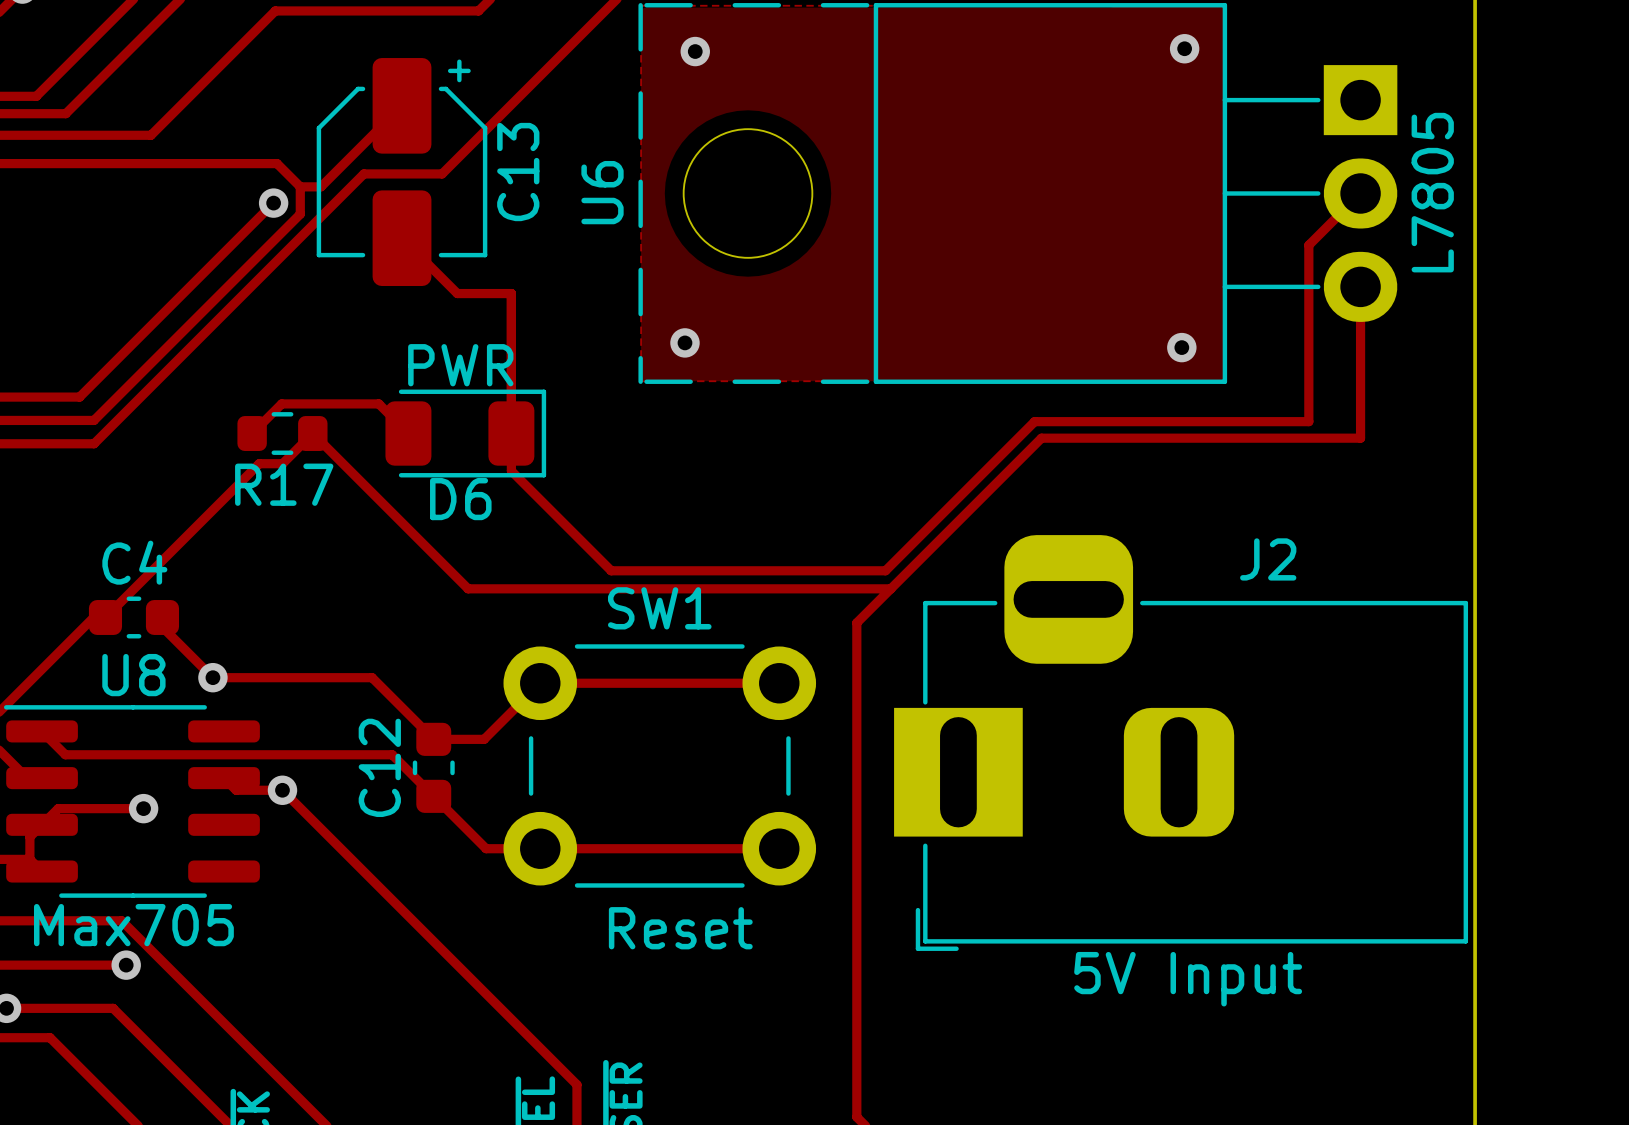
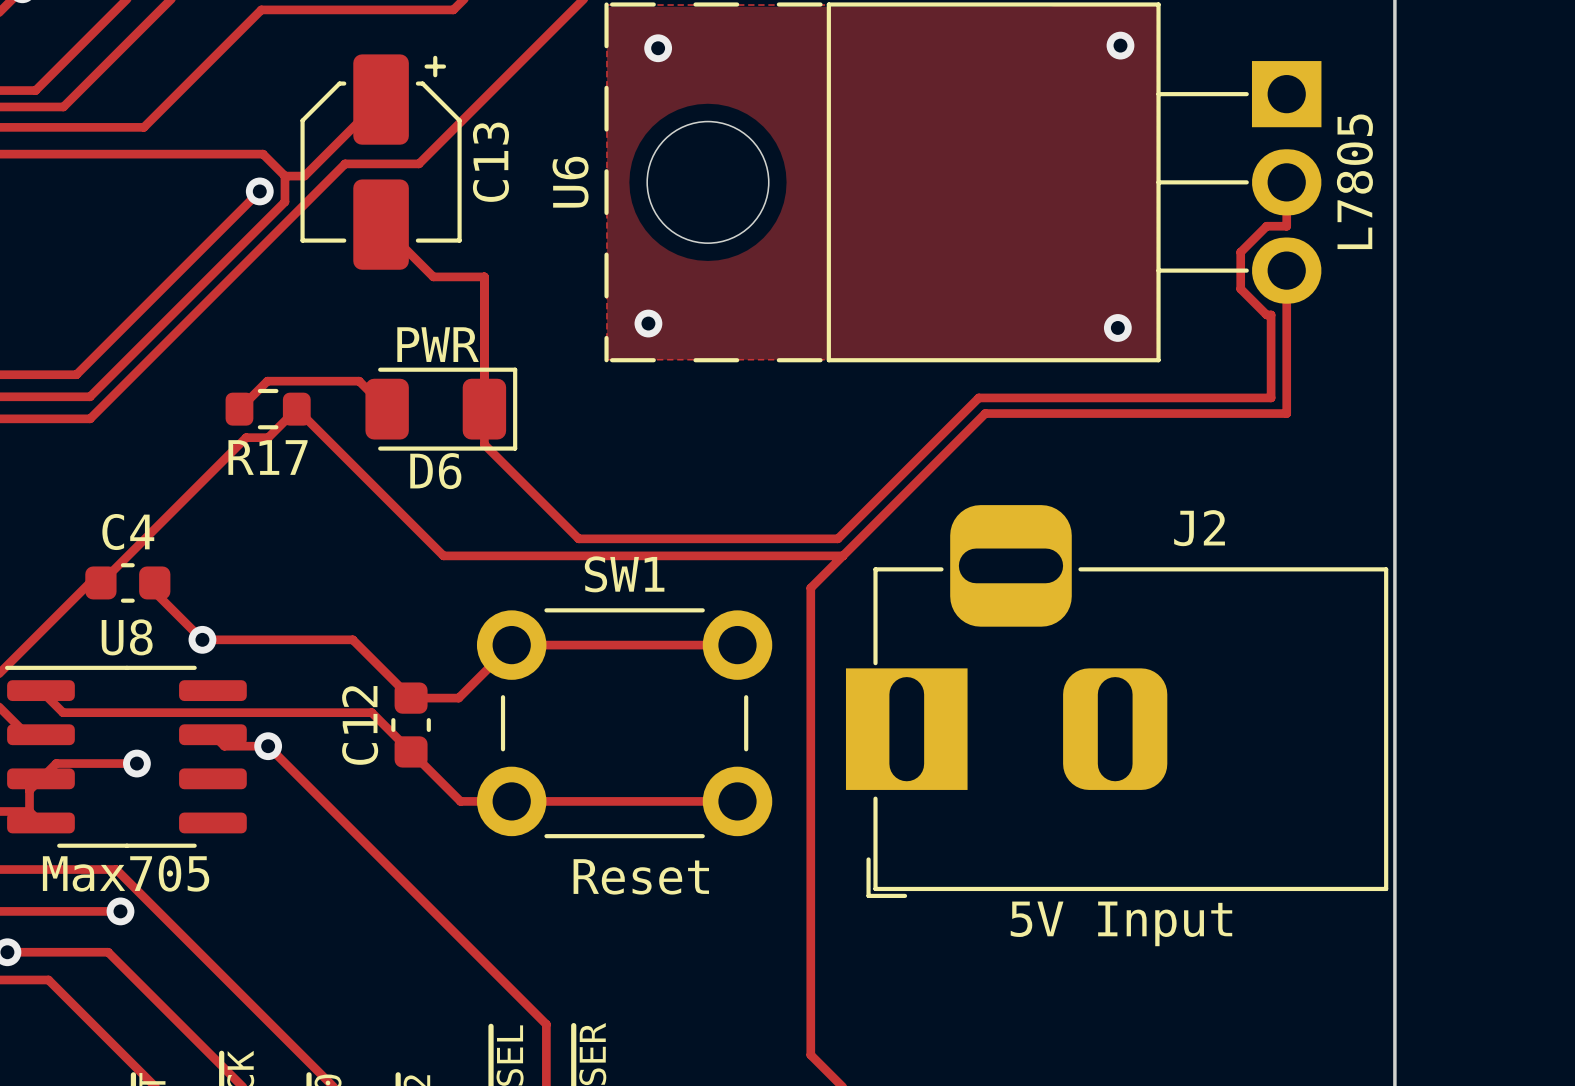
track: (1360, 193) (1308, 245) (1308, 421) -> (1286, 182) (1286, 226) (1266, 226) (1240, 252) (1240, 288) (1266, 314) (1271, 314) (1271, 397) (1237, 397)

